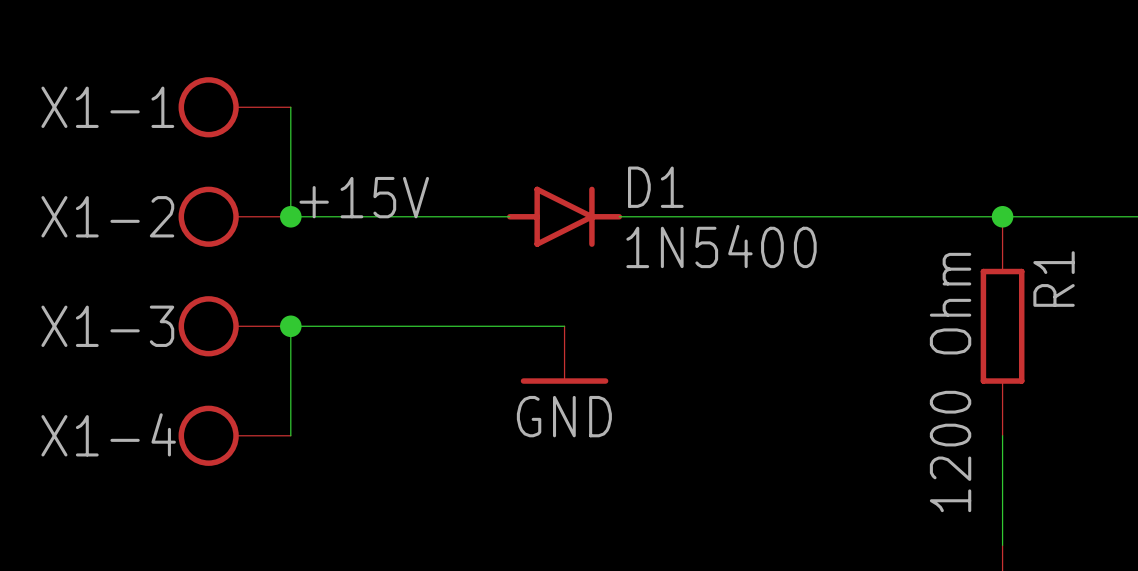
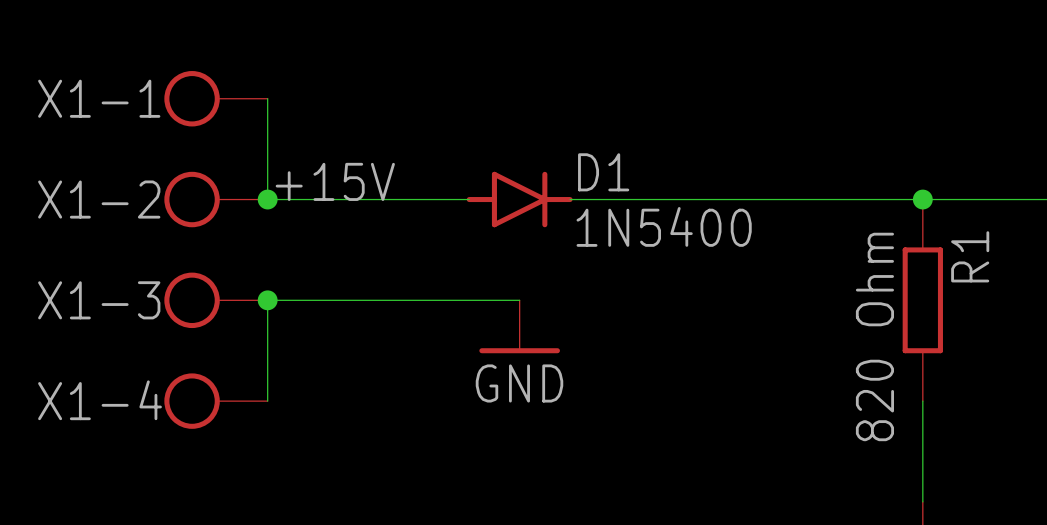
R1 value: 1200 Ohm (950, 382) -> 820 Ohm (874, 336)

